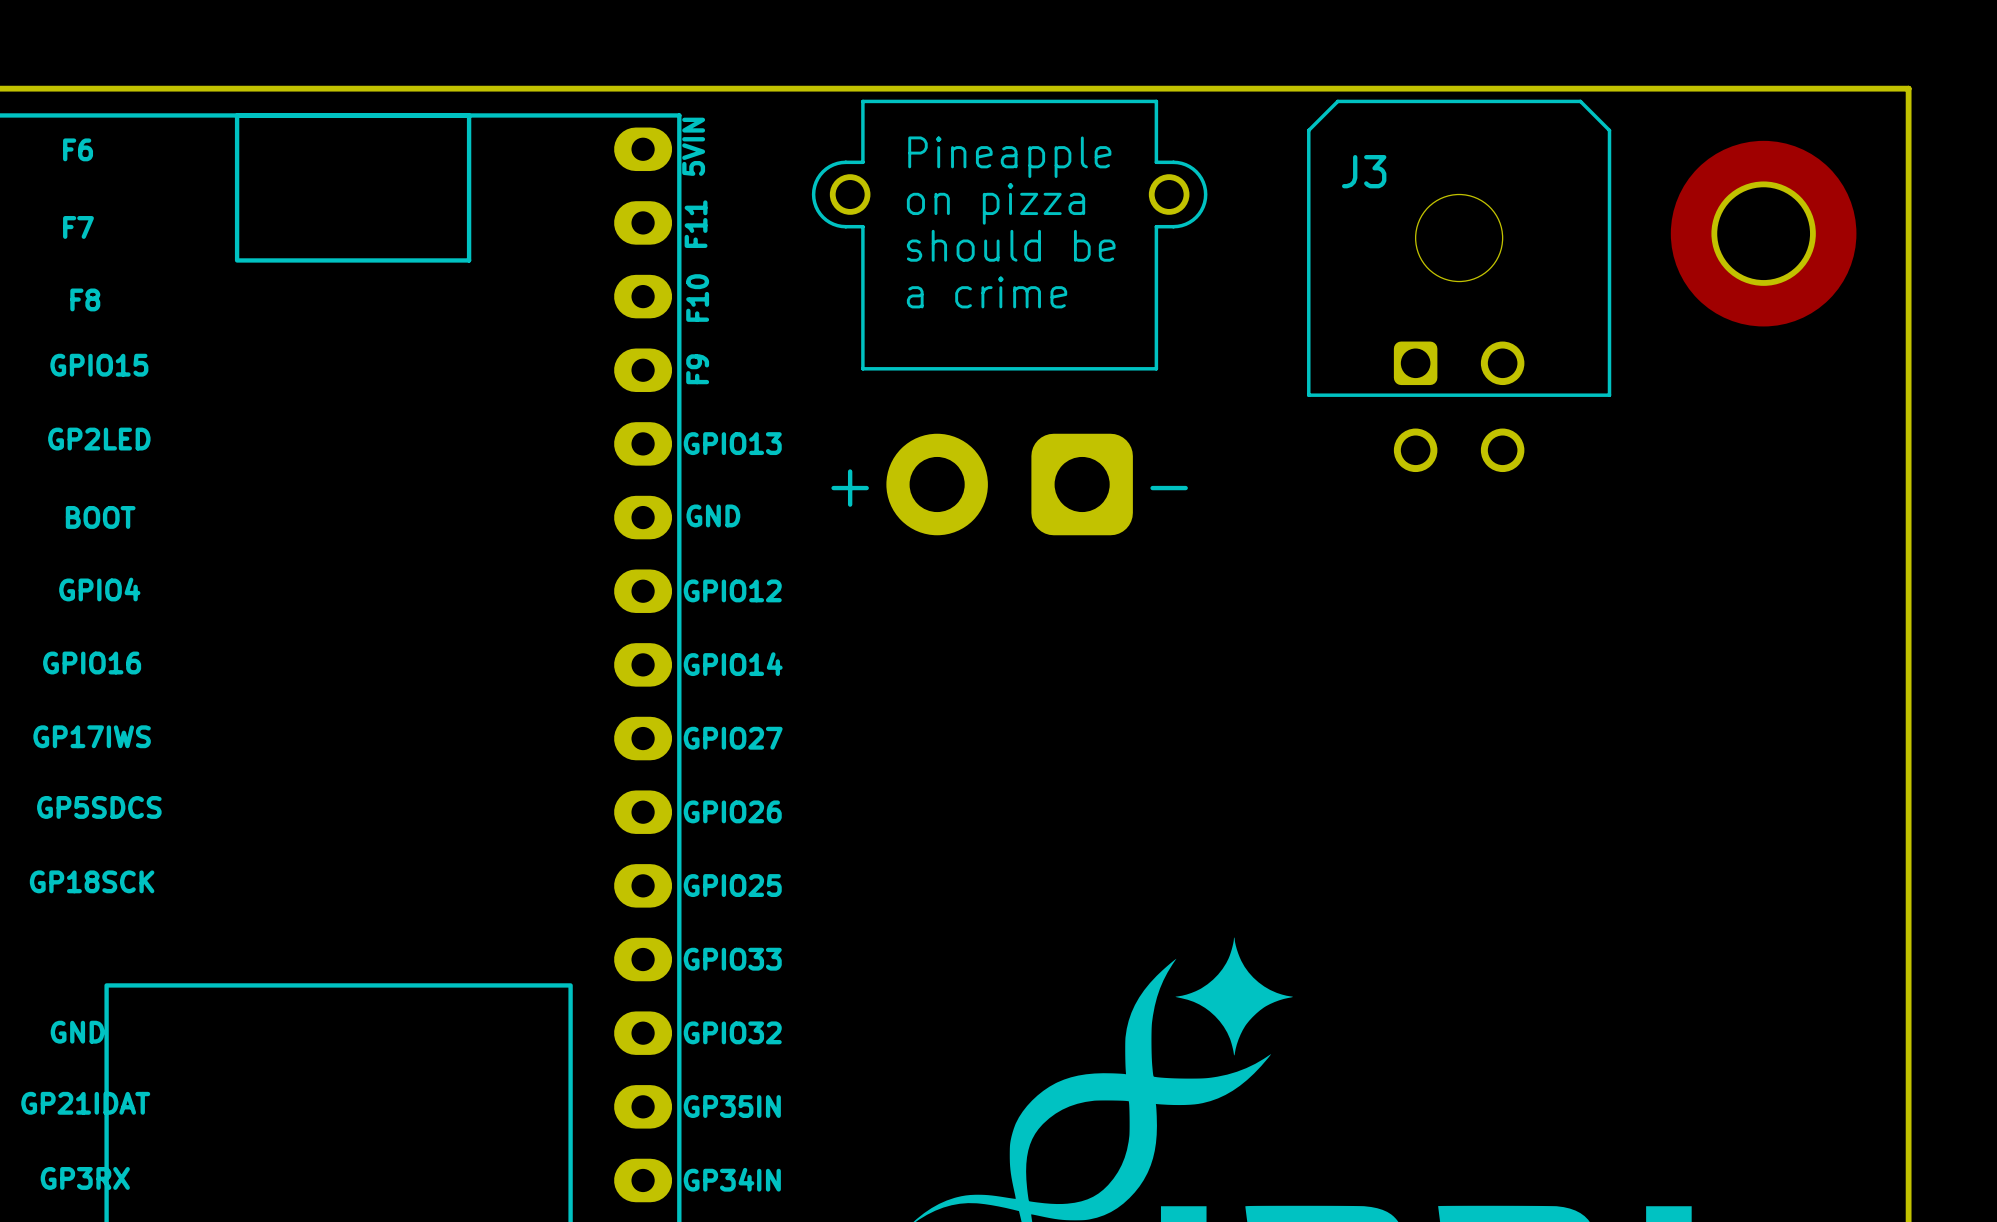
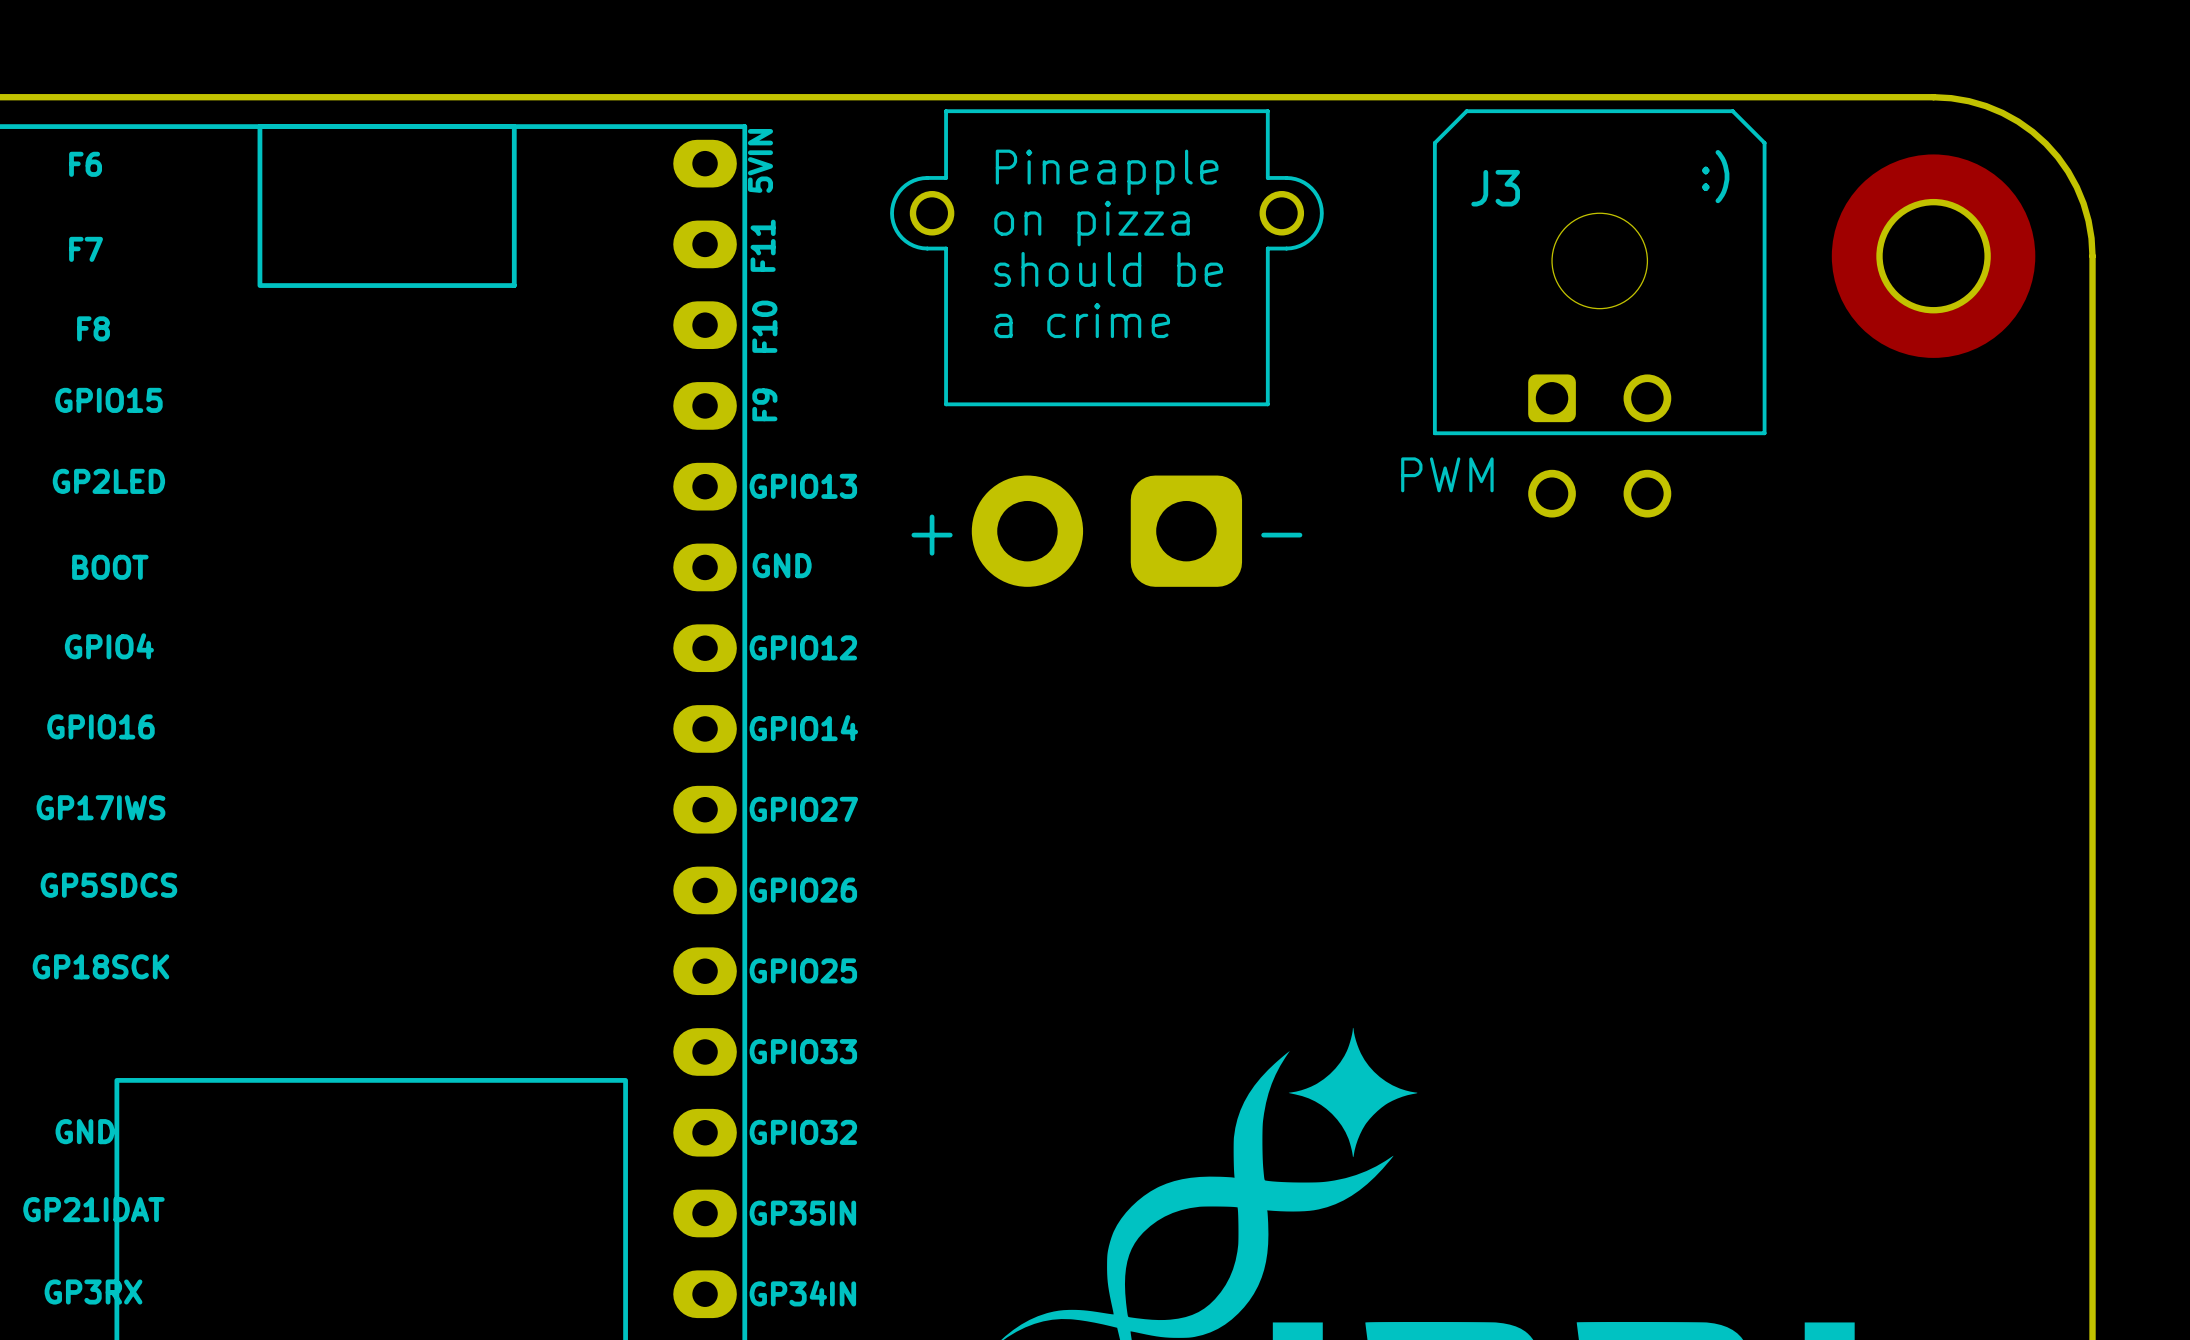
board edge: (1763, 88) (1908, 88) (1908, 233) -> (1933, 97) (1951, 98) (1986, 106) (2018, 121) (2045, 143) (2068, 171) (2083, 203) (2091, 238) (2092, 256)
text: none -> :) (1715, 176)
text: none -> PWM (1447, 474)

